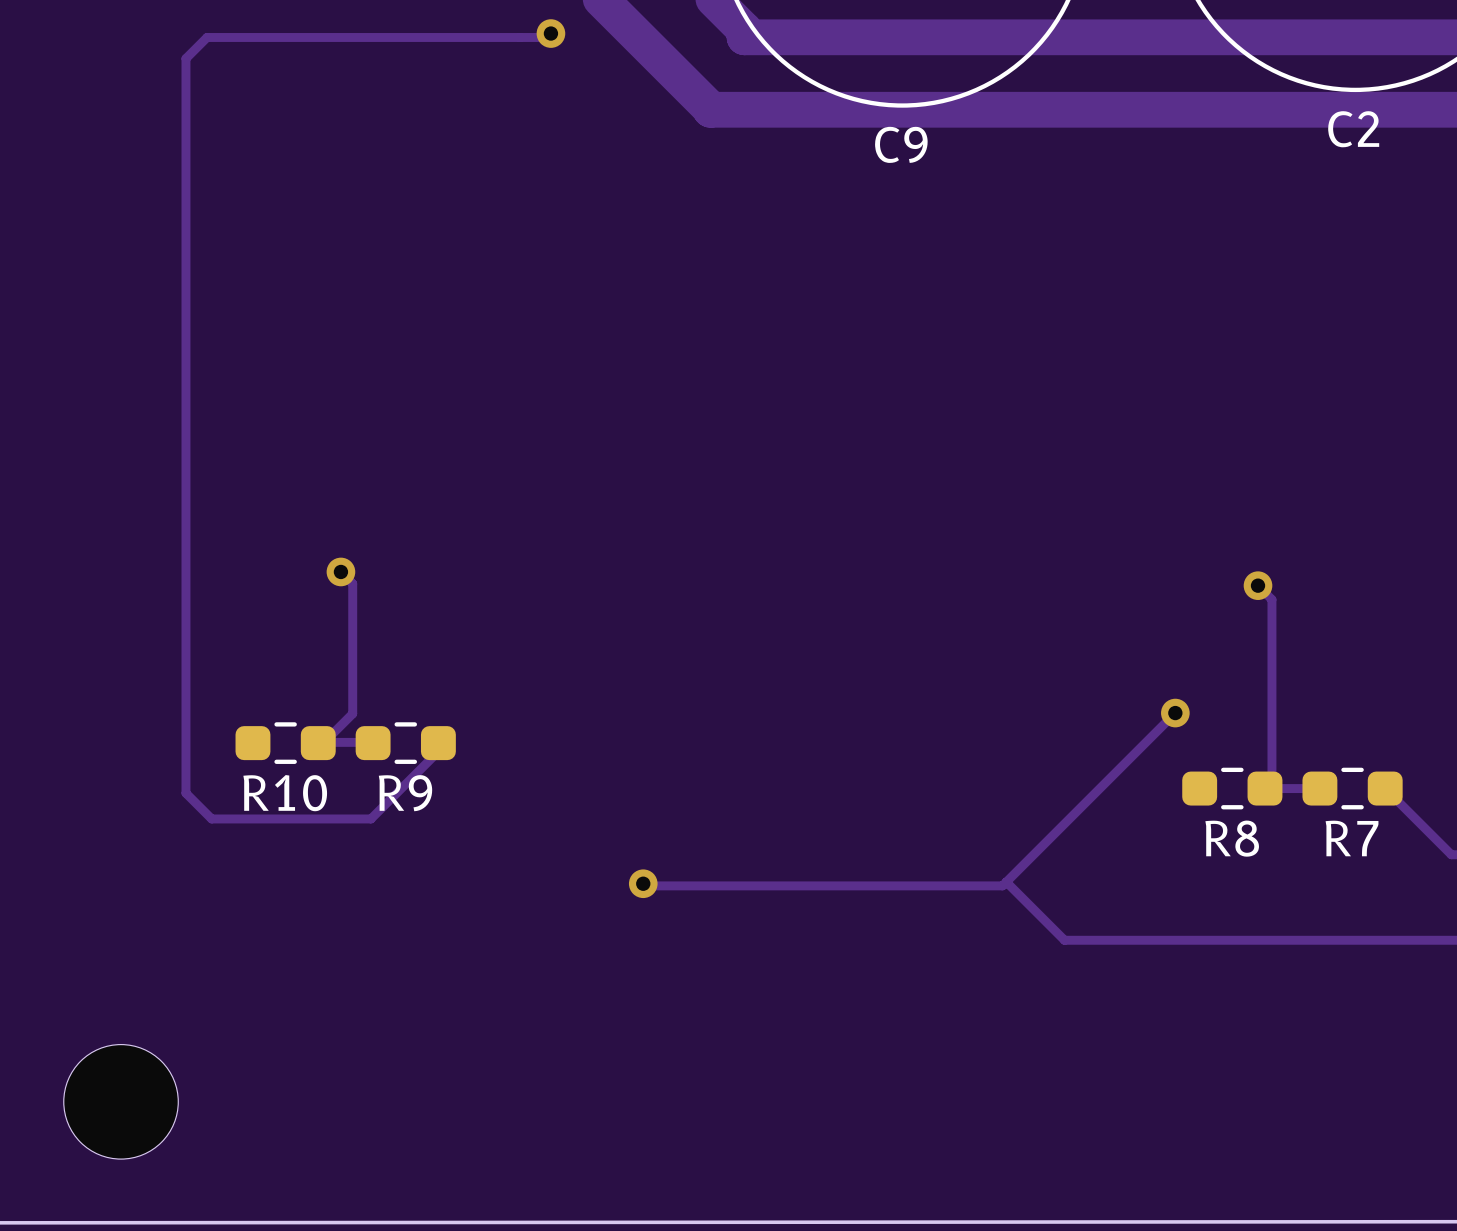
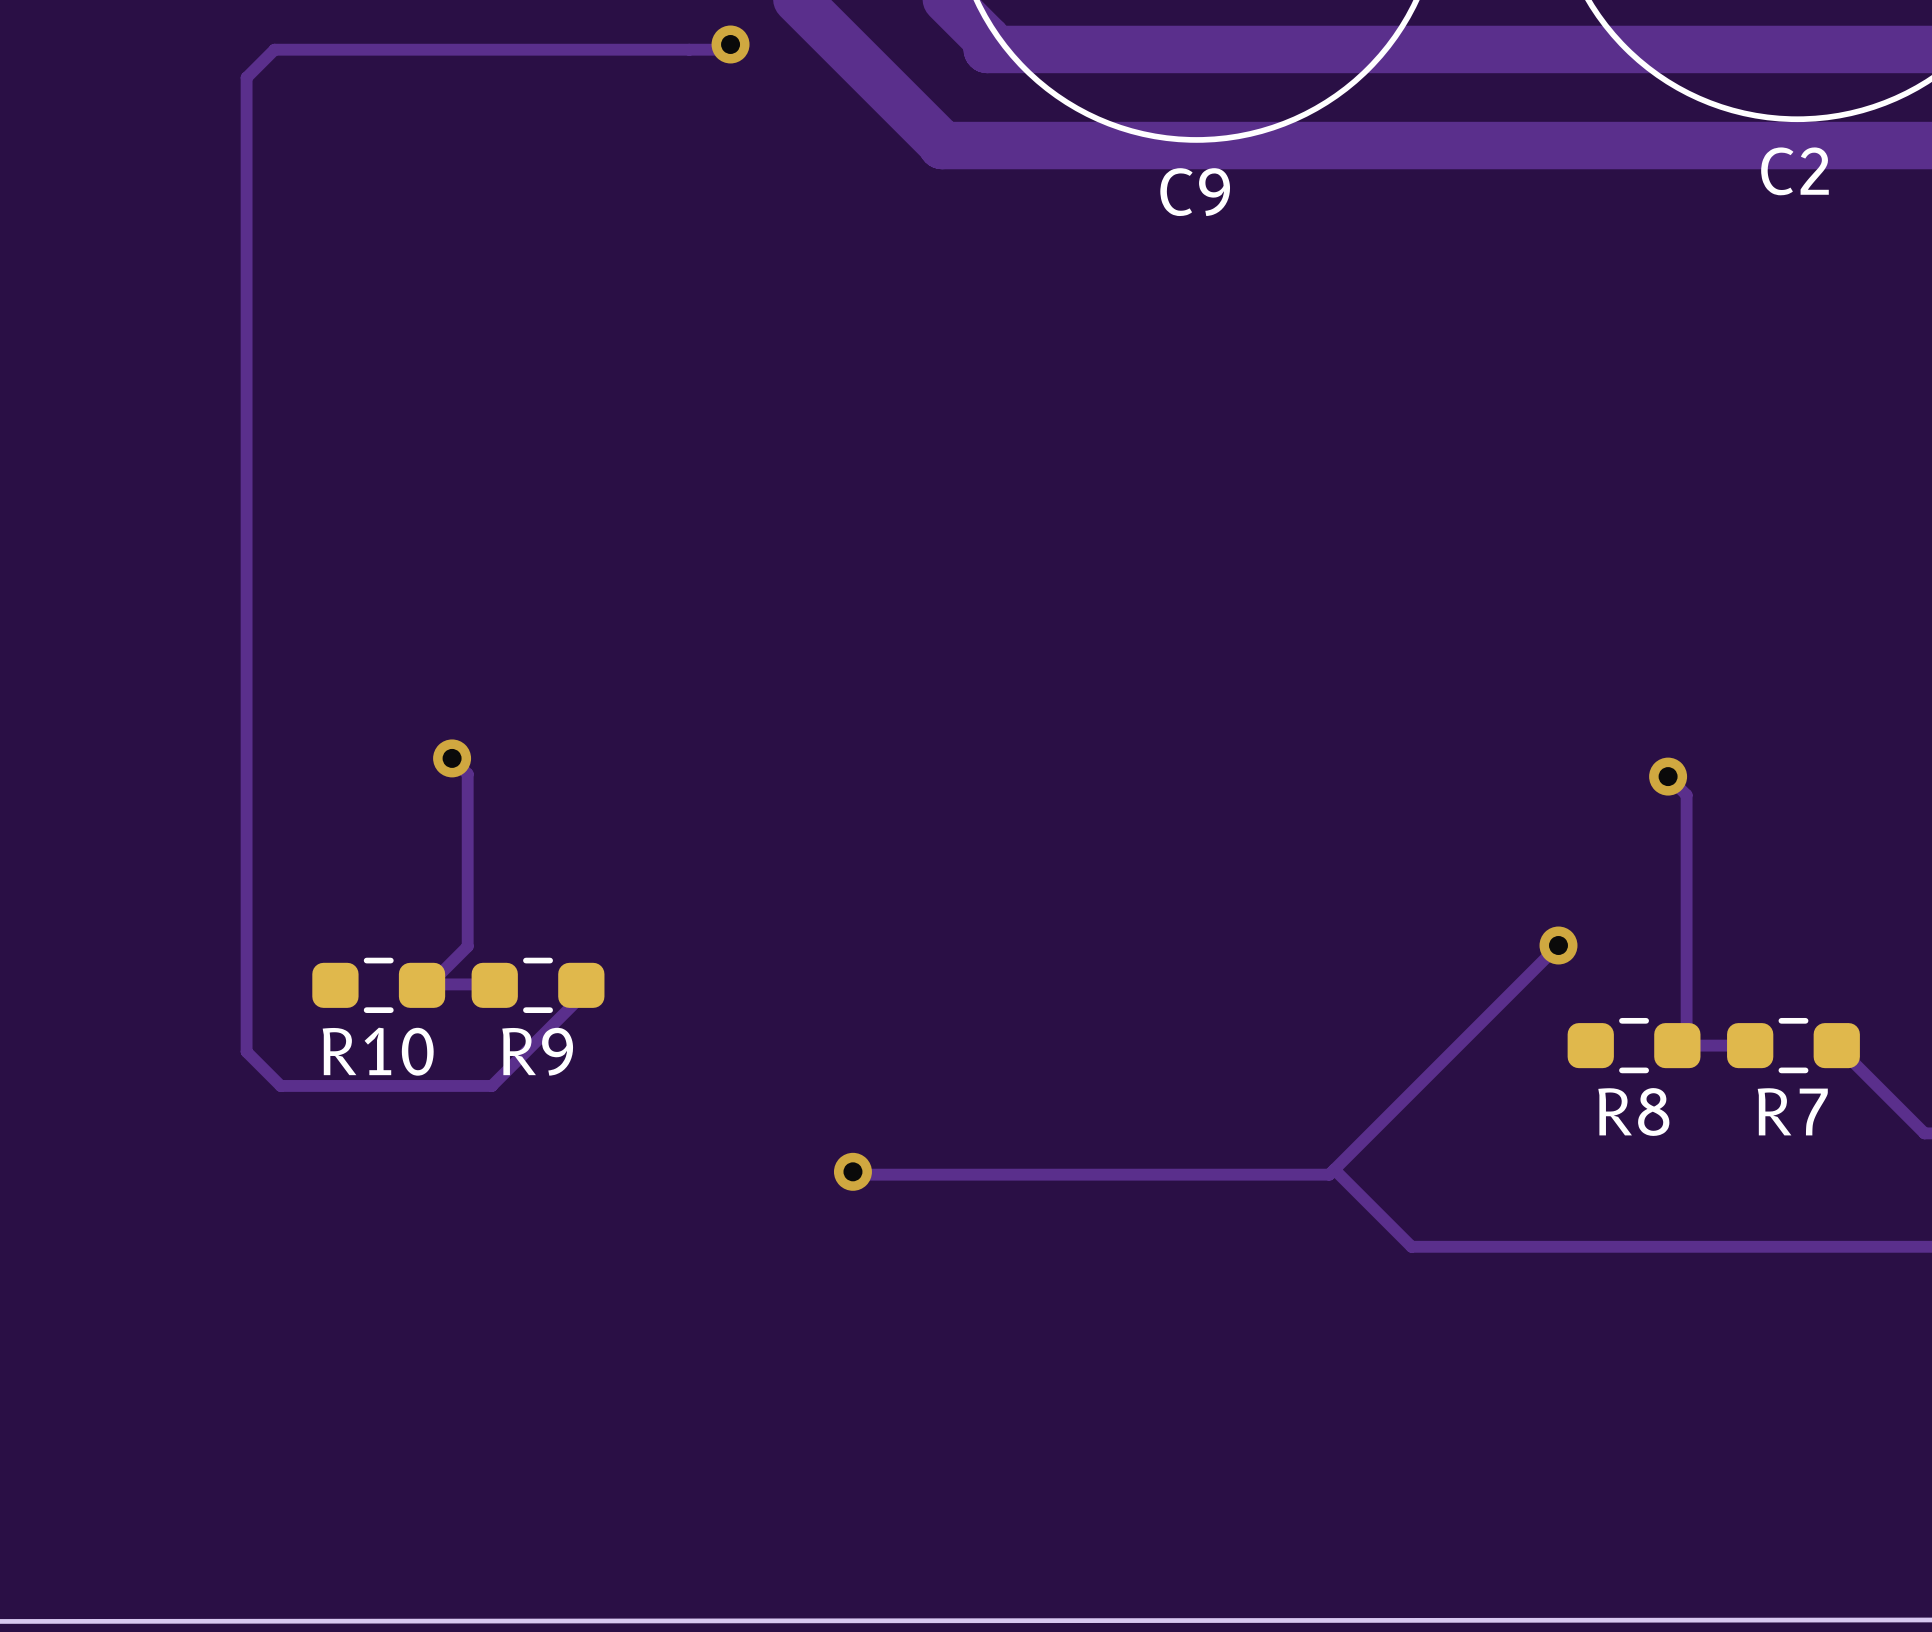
part: (121, 1101) -> none

